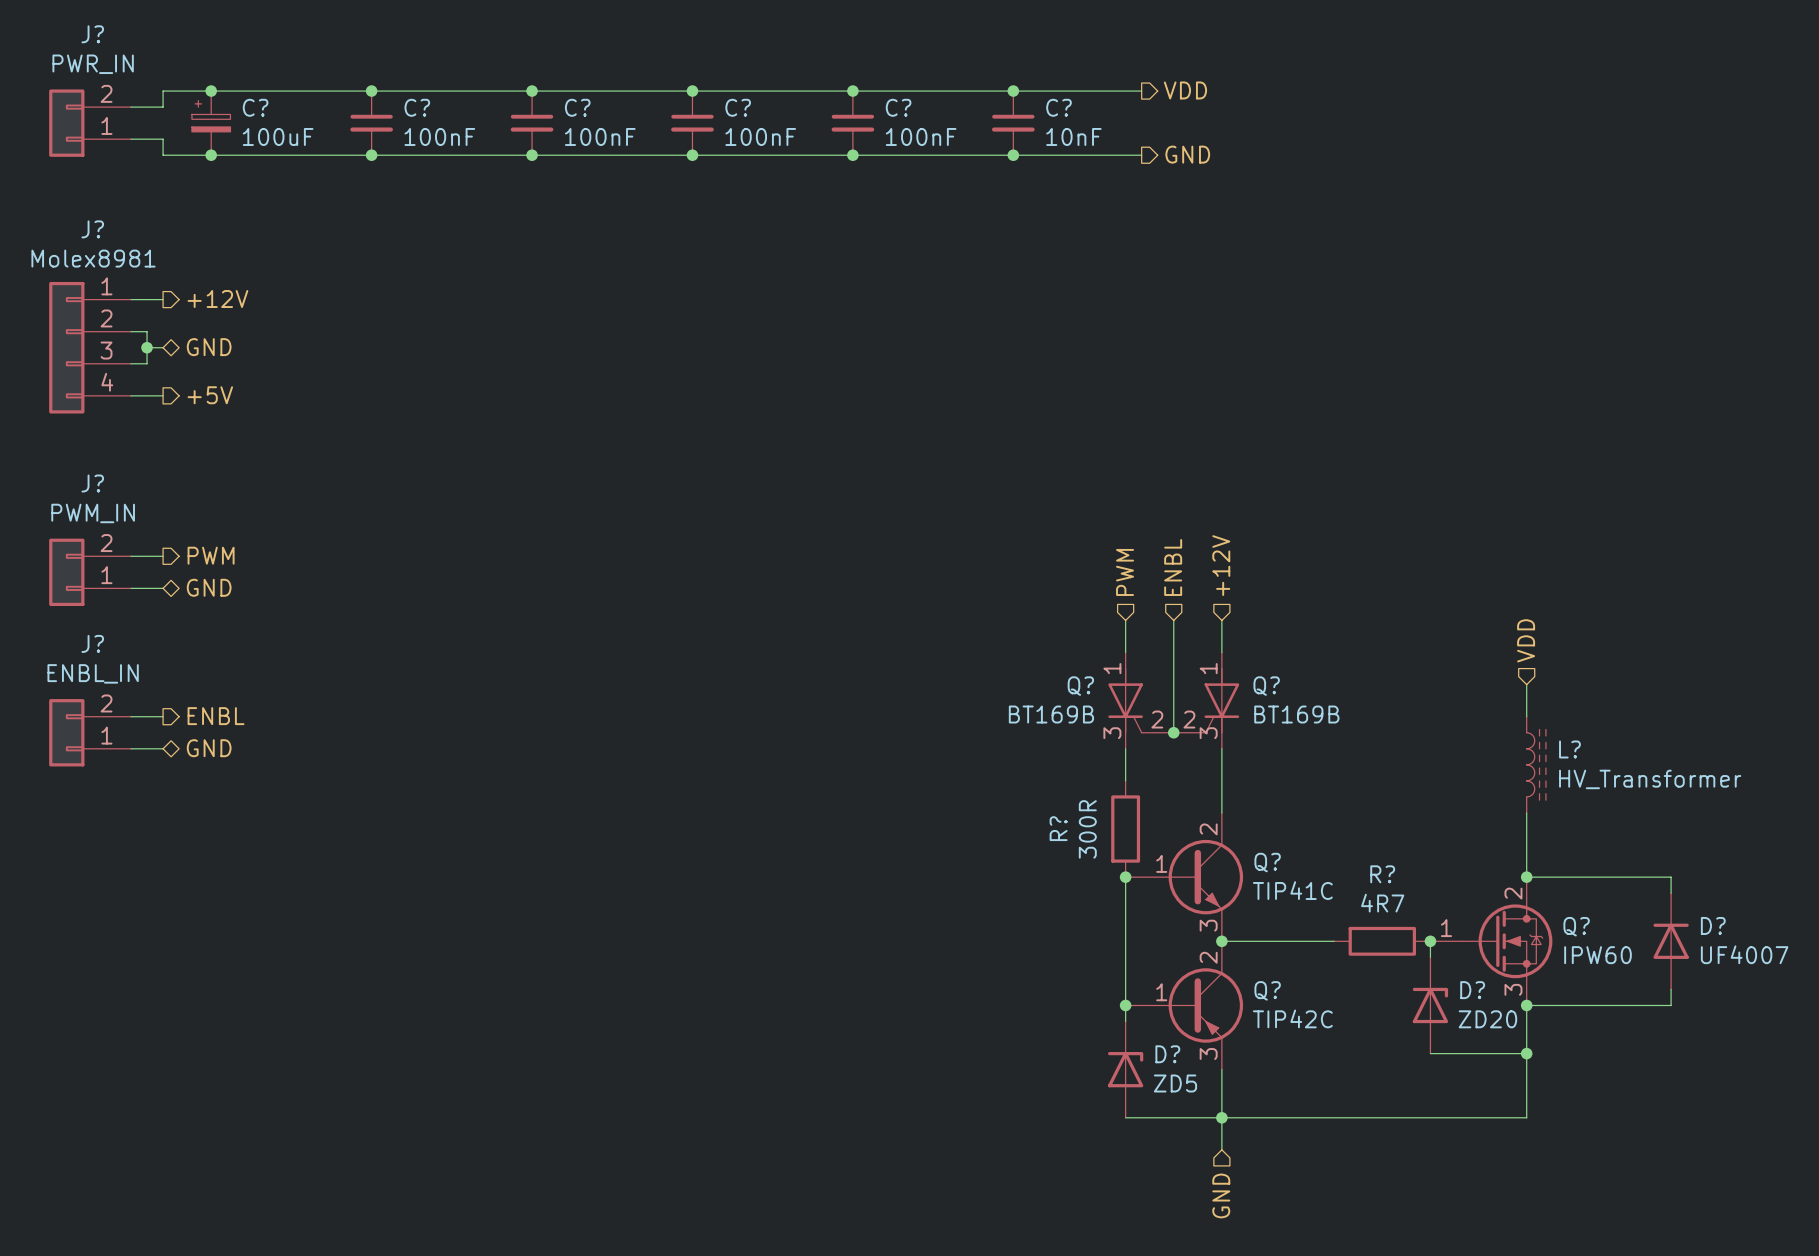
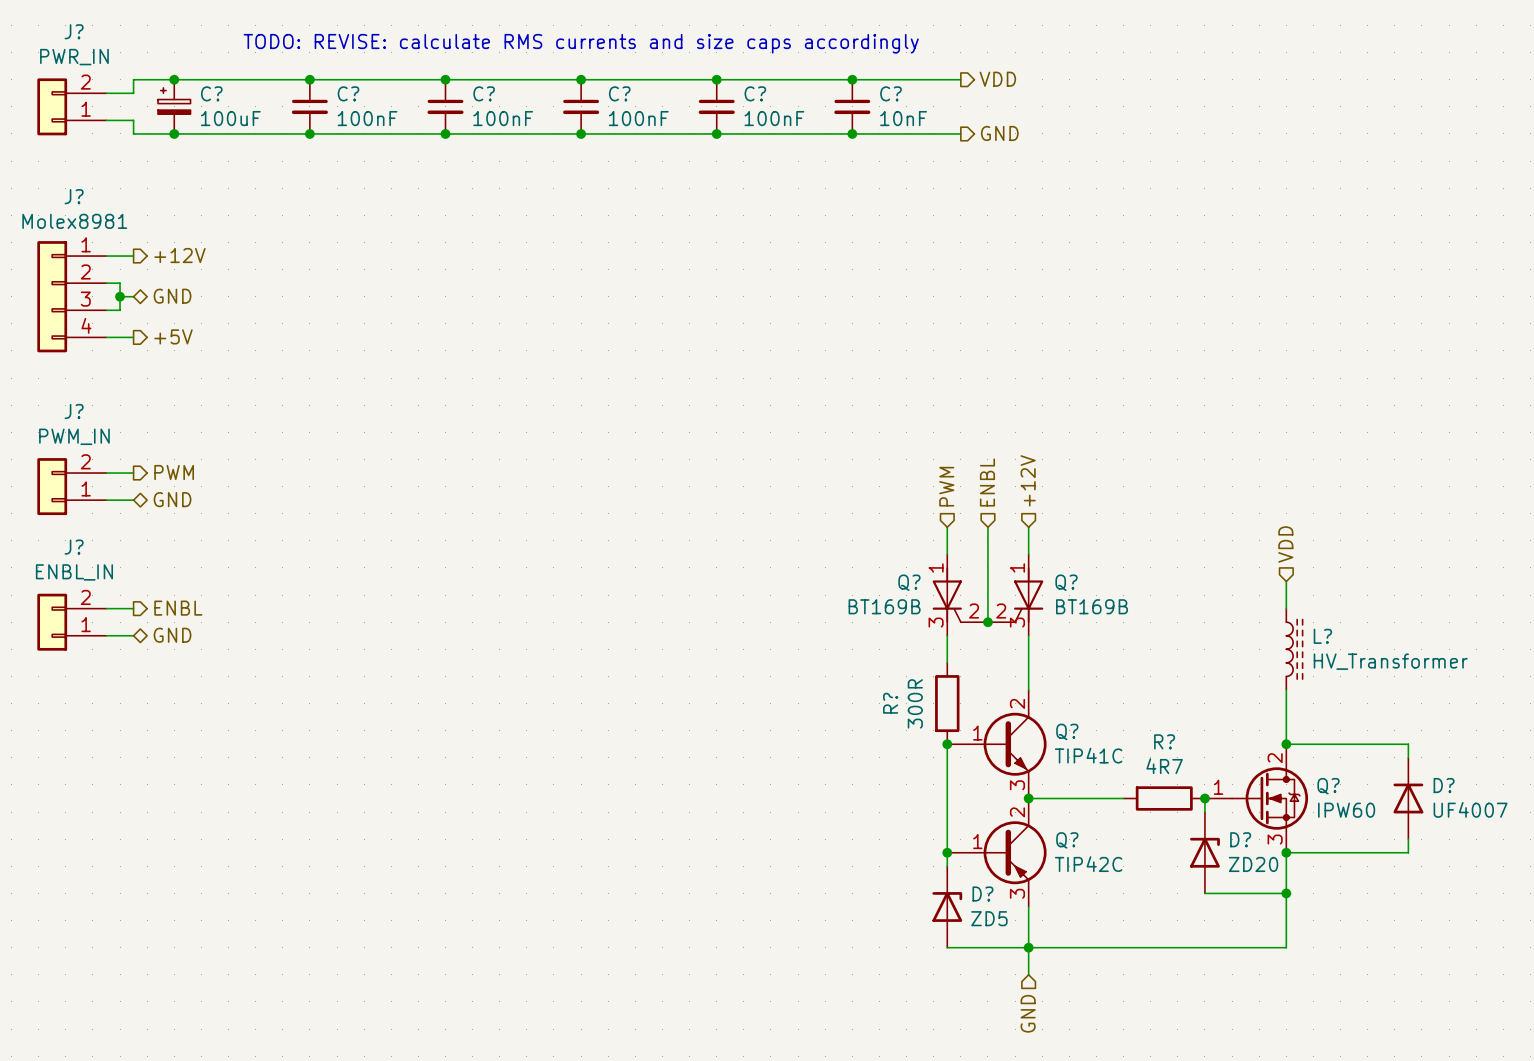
text: none -> TODO: REVISE: calculate RMS currents and size caps accordingly (581, 43)

